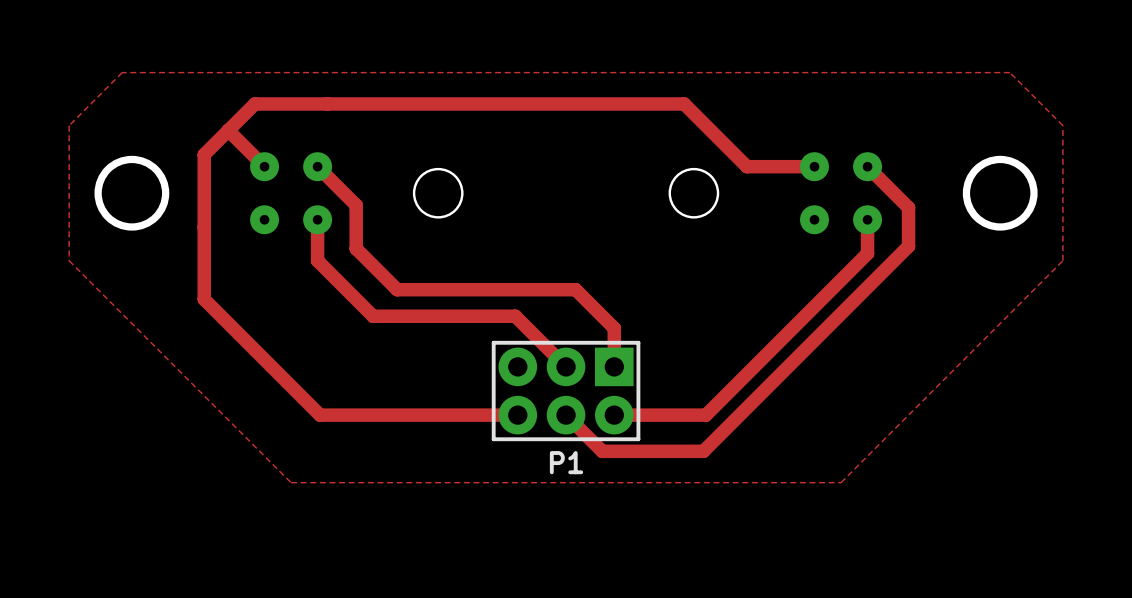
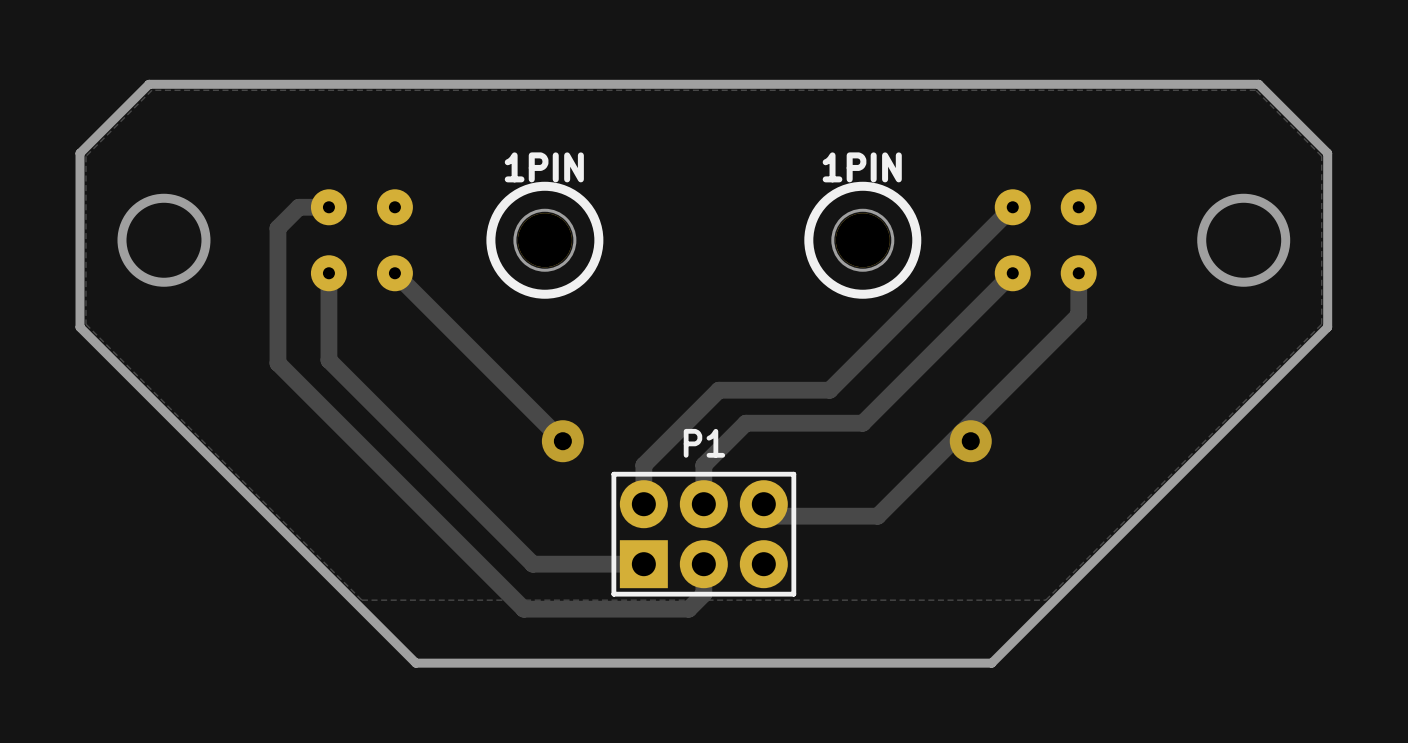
board edge: none -> (148, 84) (80, 153) (80, 327) (415, 663) (991, 663) (1327, 327) (1327, 153) (1258, 84) (148, 84)
track: (228, 132) (228, 130) (264, 166) -> (703, 564) (703, 594) (688, 609) (523, 609) (277, 363) (277, 228) (298, 207) (328, 207)
track: (317, 166) (356, 205) (356, 248) (397, 289) (575, 289) (614, 328) (614, 366) -> none
track: (814, 166) (746, 166) (684, 103) (254, 103) (204, 154) (204, 299) (320, 415) (517, 415) -> (1012, 207) (829, 390) (718, 390) (643, 465) (643, 504)
track: (867, 166) (908, 207) (908, 246) (703, 451) (602, 451) (566, 415) -> none
1PIN: none -> (544, 240)
1PIN: none -> (862, 240)
track: none -> (328, 273) (328, 360) (532, 564) (643, 564)
track: (317, 219) (317, 260) (373, 316) (515, 316) (566, 366) -> (394, 273) (562, 441)
track: none -> (1012, 273) (862, 423) (745, 423) (703, 465) (703, 504)
via: none -> (562, 441)
via: none -> (970, 441)
P1 rotation: 0° (566, 391) -> 180° (703, 534)

